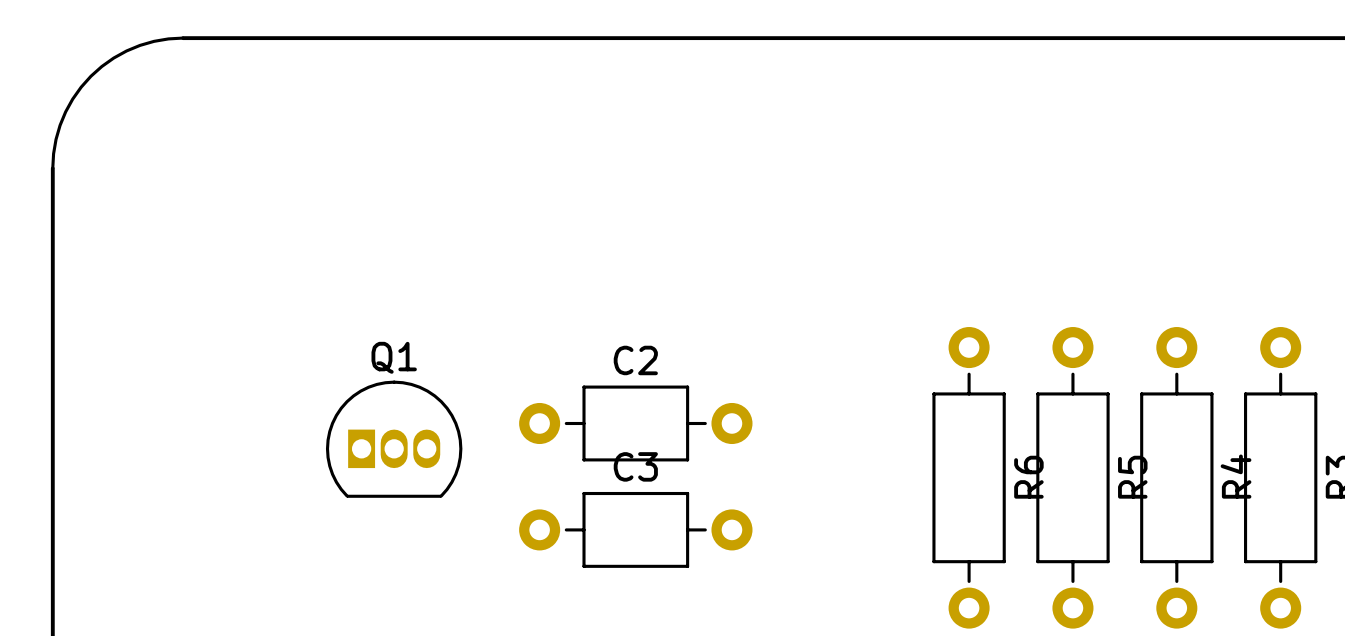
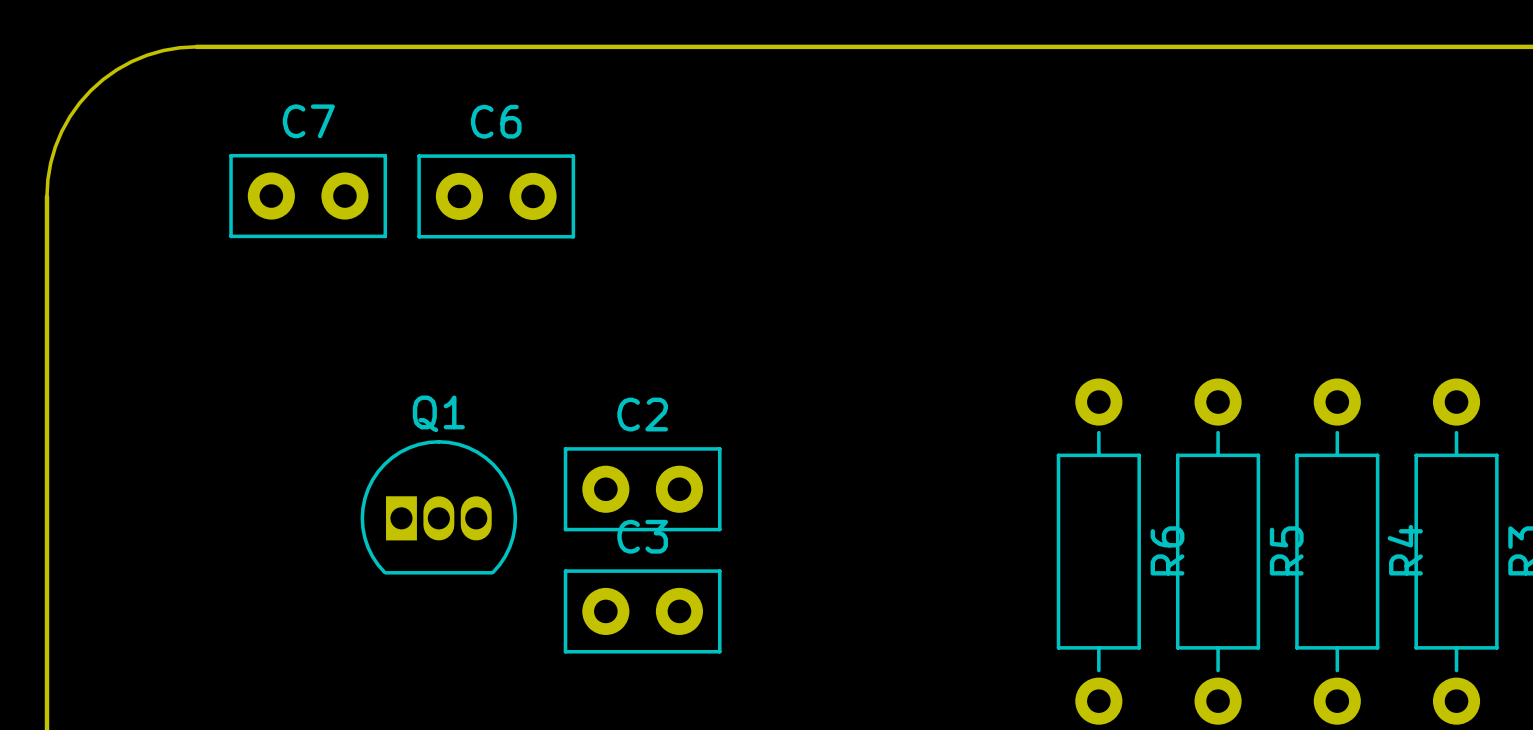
C7: none -> (308, 196)
C6: none -> (496, 196)
C2 footprint: [519, 385, 753, 462] -> [563, 447, 722, 532]
C3 footprint: [519, 491, 753, 568] -> [563, 569, 722, 654]

